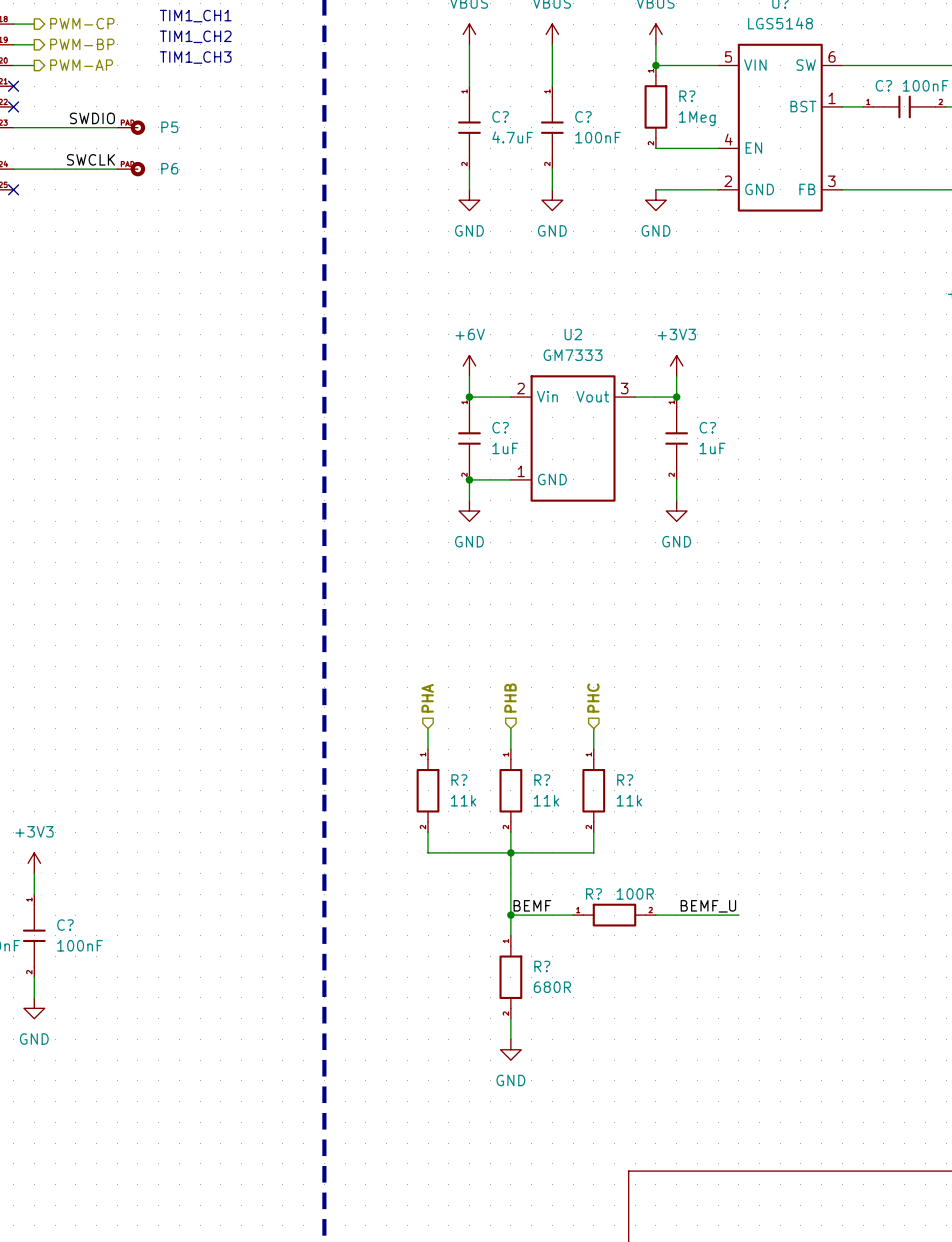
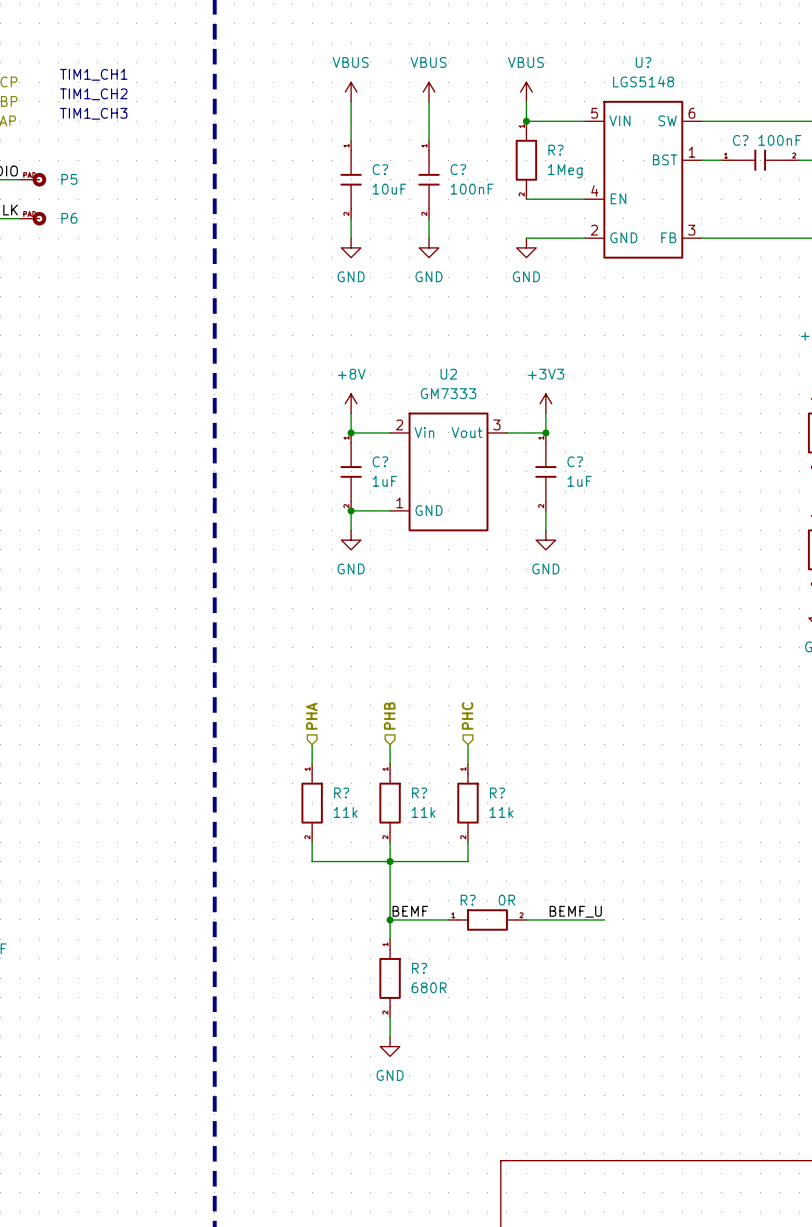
C? value: 4.7uF (512, 137) -> 10uF (389, 189)
power symbol: +6V (469, 365) -> +8V (351, 403)
R? value: 100R (635, 893) -> 0R (506, 900)

